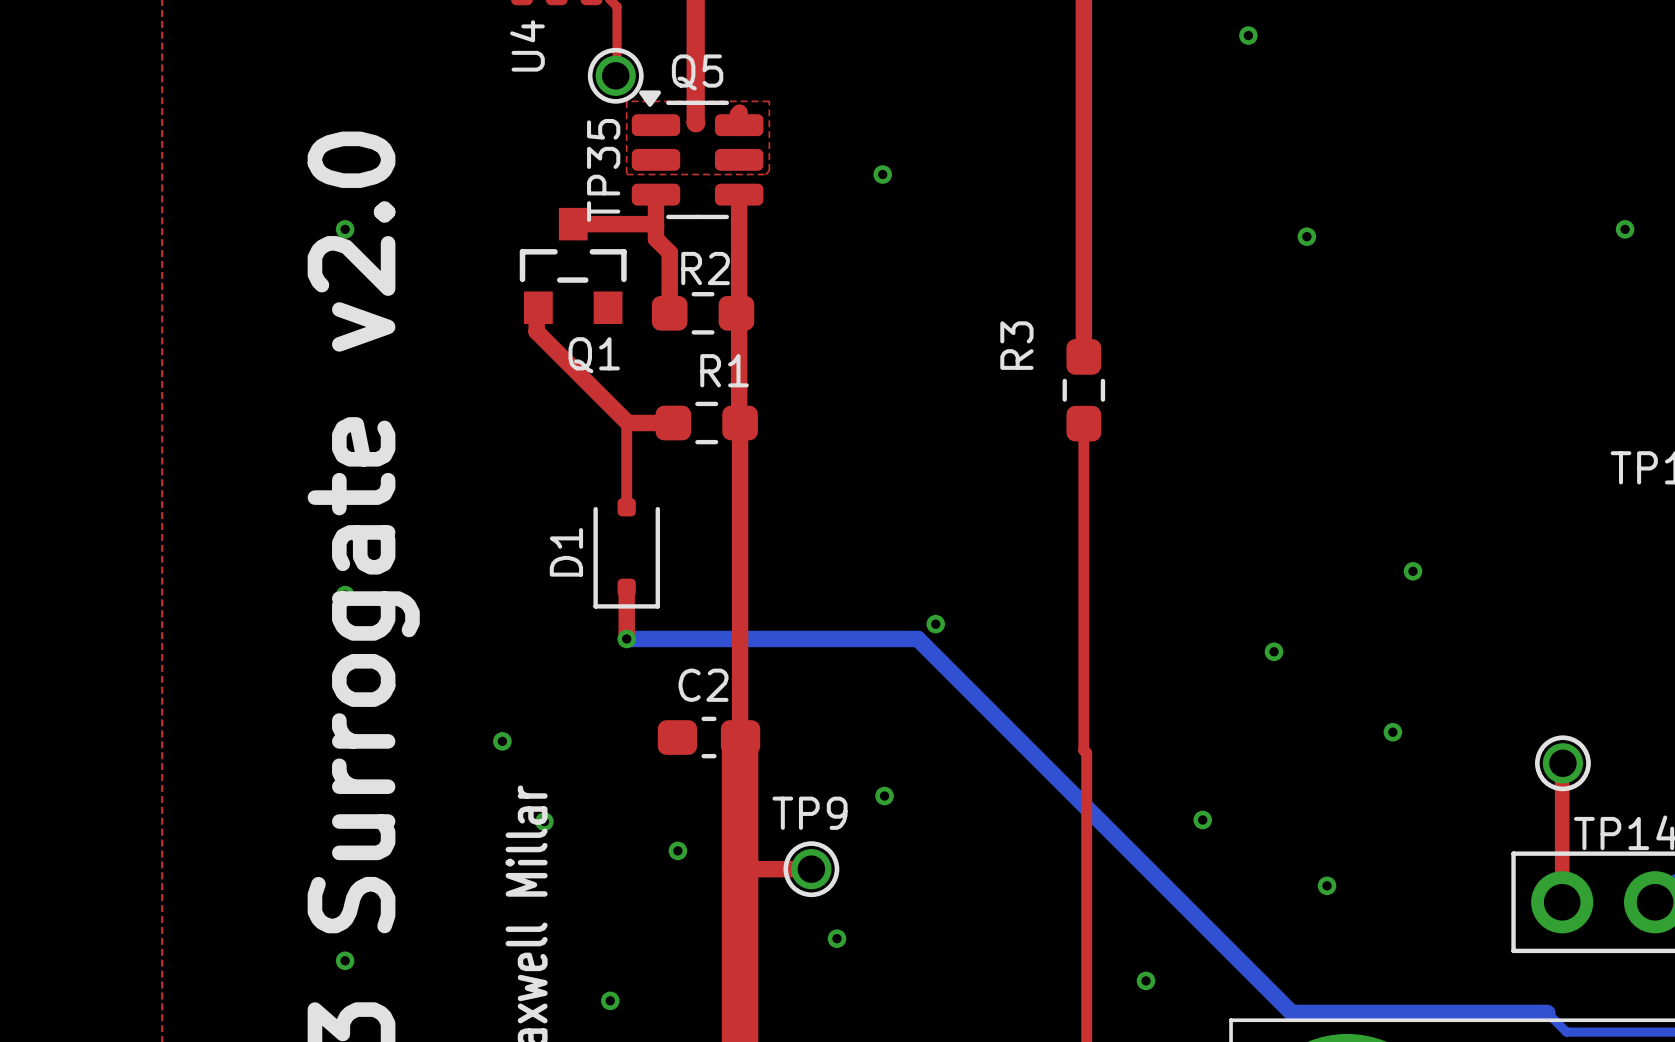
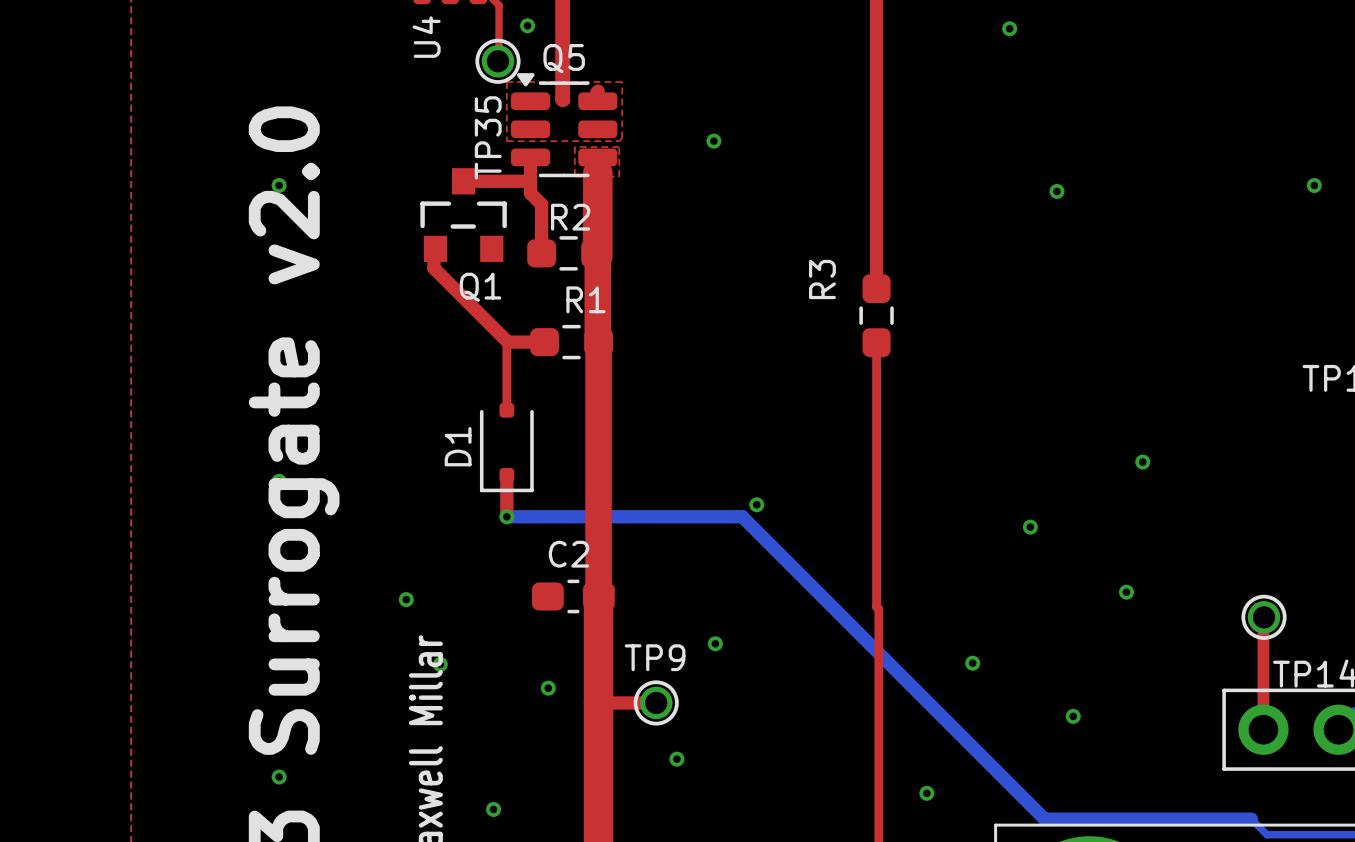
via: none -> (527, 25)
top zone outline: none -> (574, 147) (574, 176) (619, 176) (619, 147) (574, 147)
top track width: thin (739, 213) (739, 415) -> thick (597, 172) (597, 336)
top track width: thin (740, 423) (740, 737) -> thick (598, 342) (598, 596)

